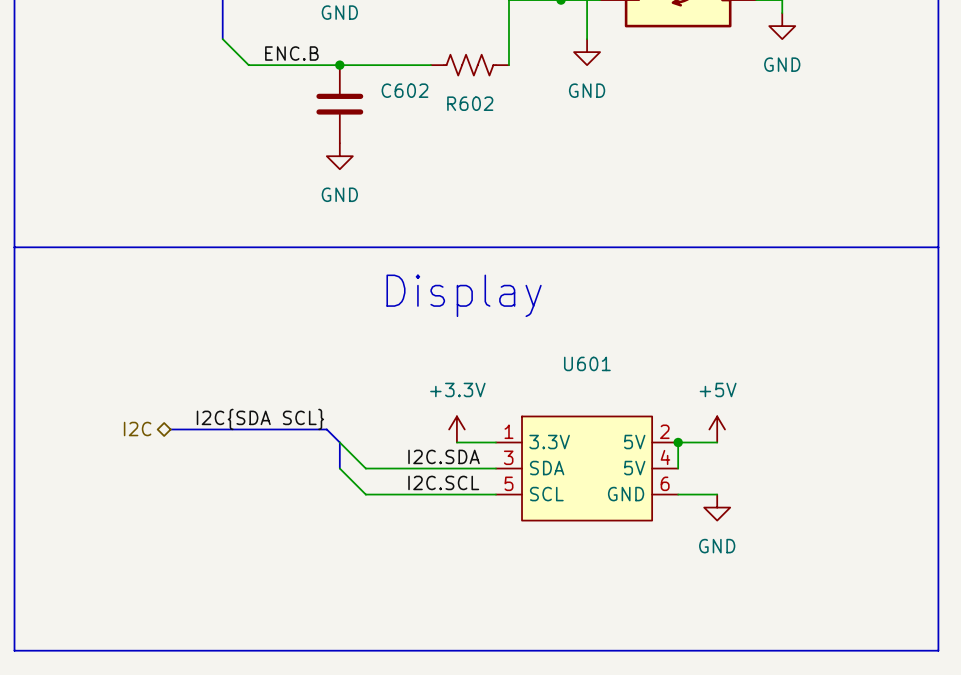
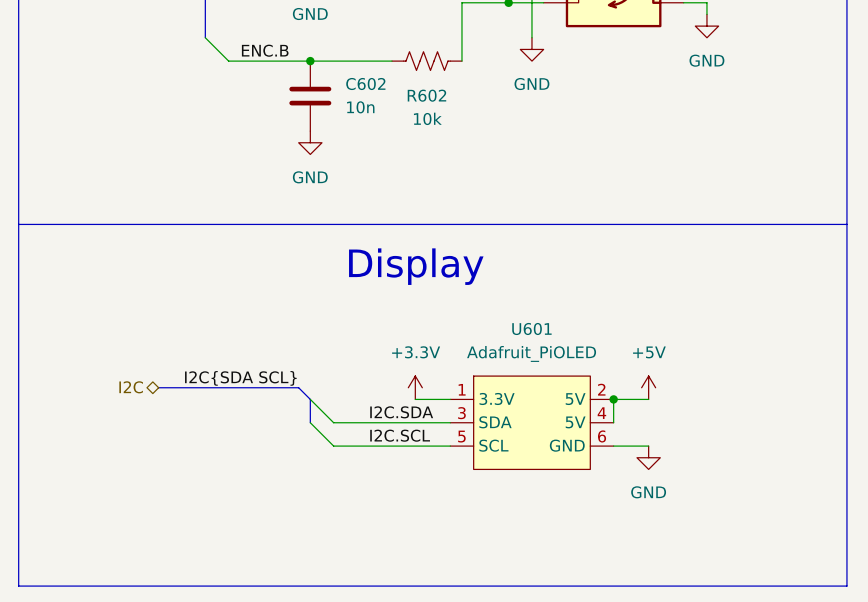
C602 value: none -> 10n (360, 107)
R602 value: none -> 10k (427, 118)
U601 value: none -> Adafruit_PiOLED (531, 353)

